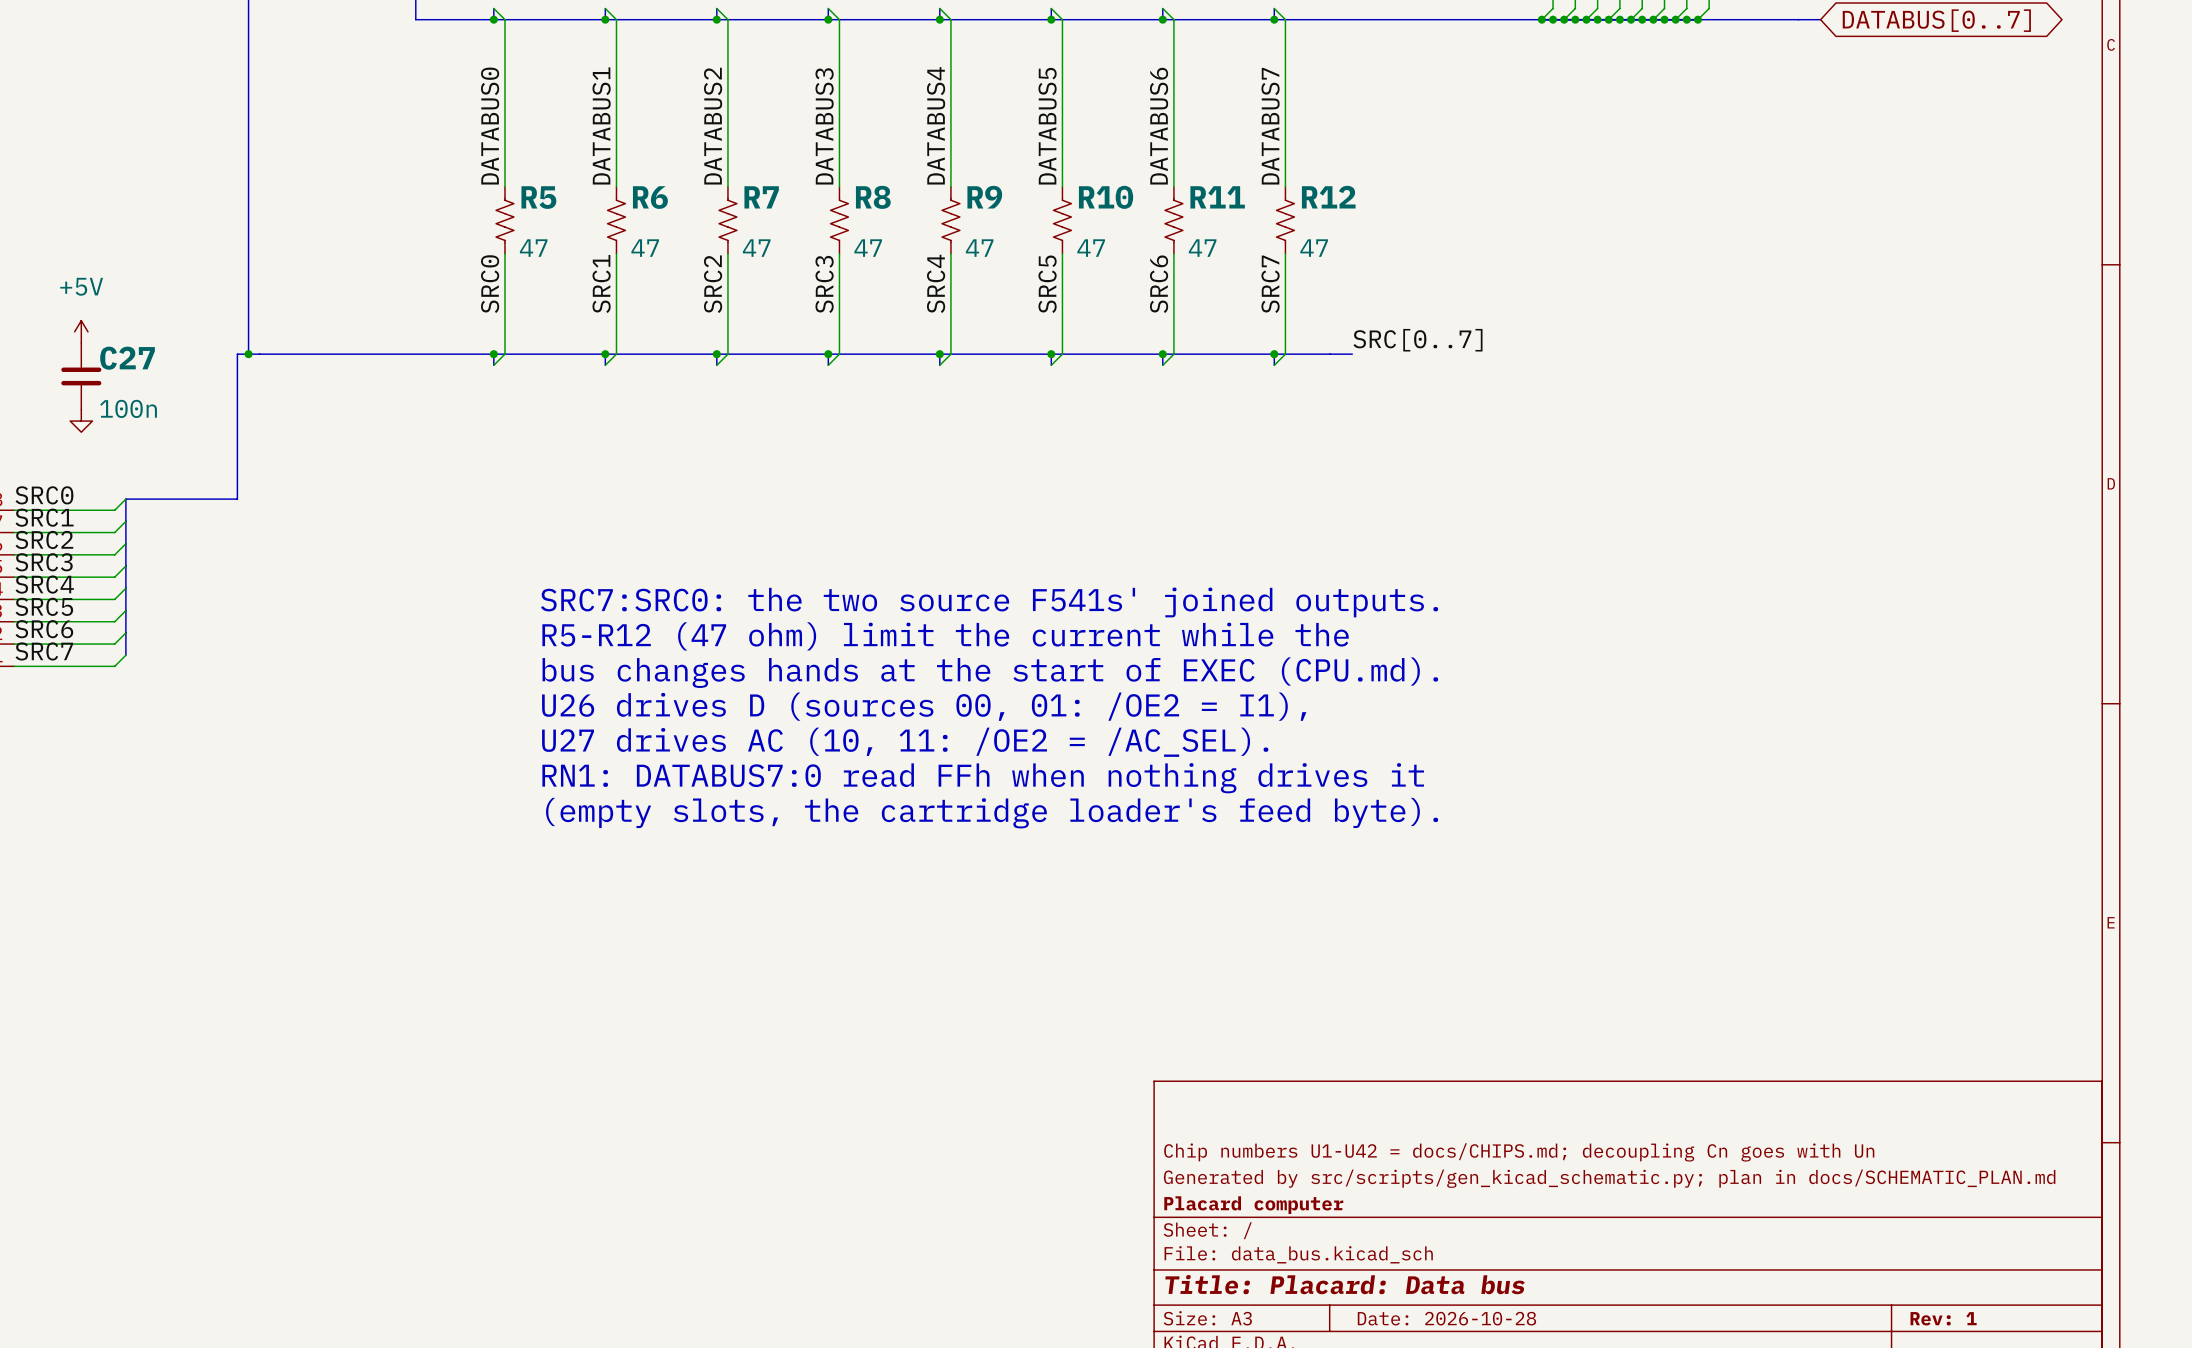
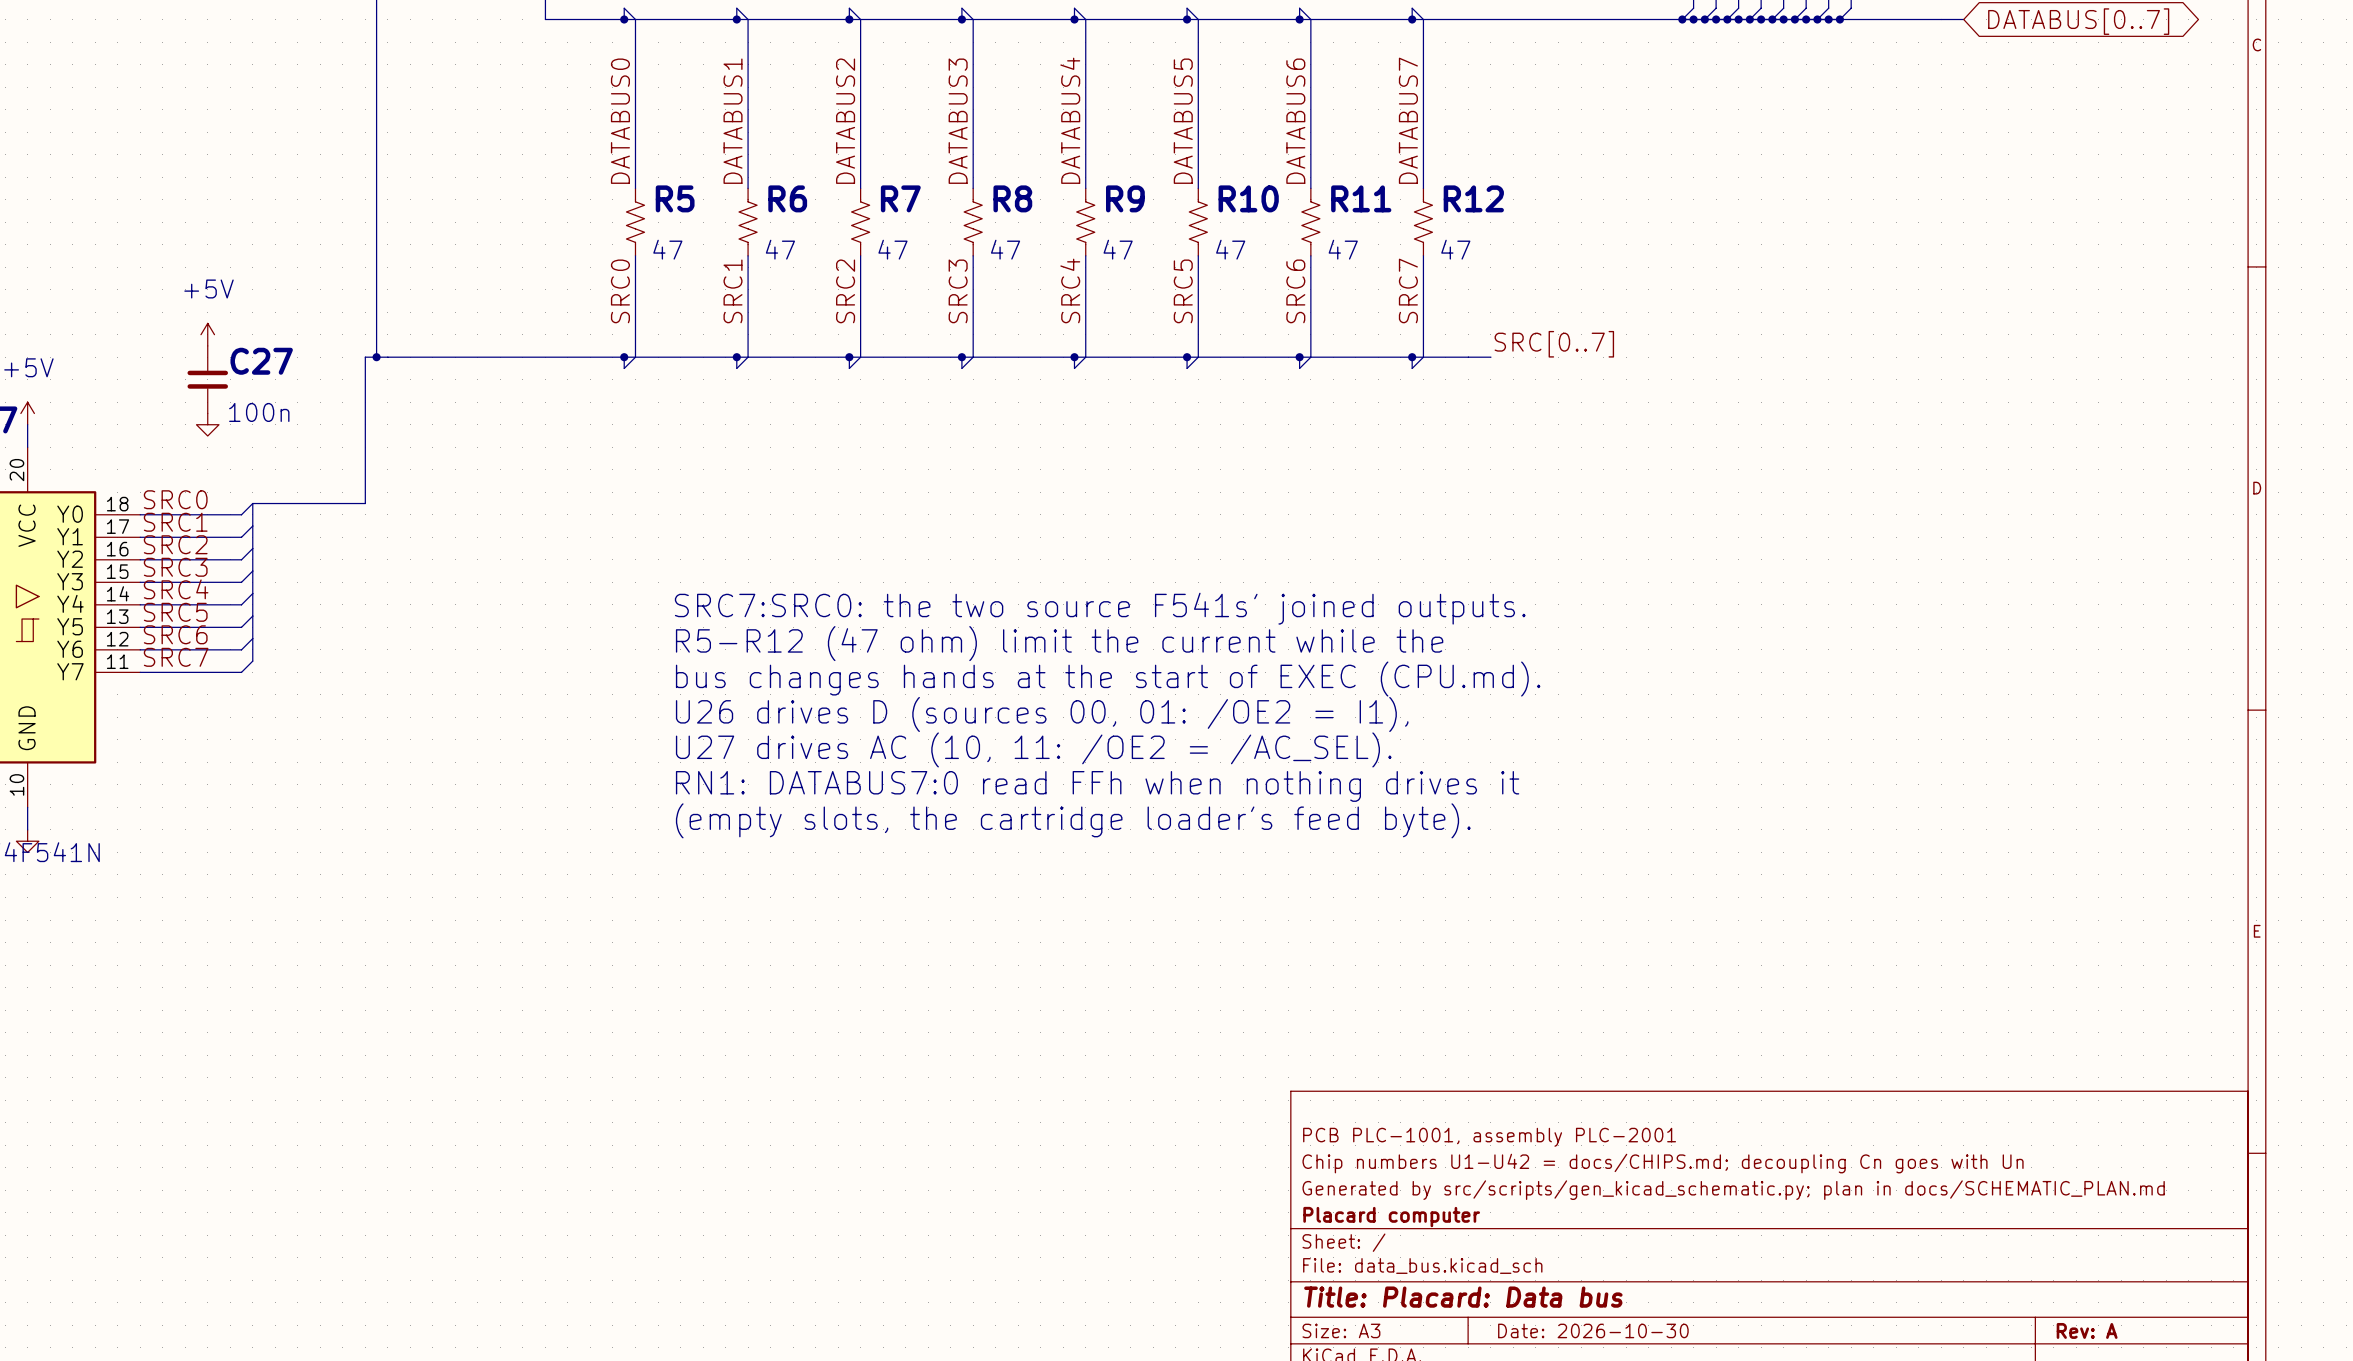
title block: none -> PCB PLC-1001, assembly PLC-2001 (1489, 1137)
title block: Date: 2026-10-28 (1446, 1318) -> Date: 2026-10-30 (1593, 1330)
title block: Rev: 1 (1943, 1318) -> Rev: A (2087, 1330)

